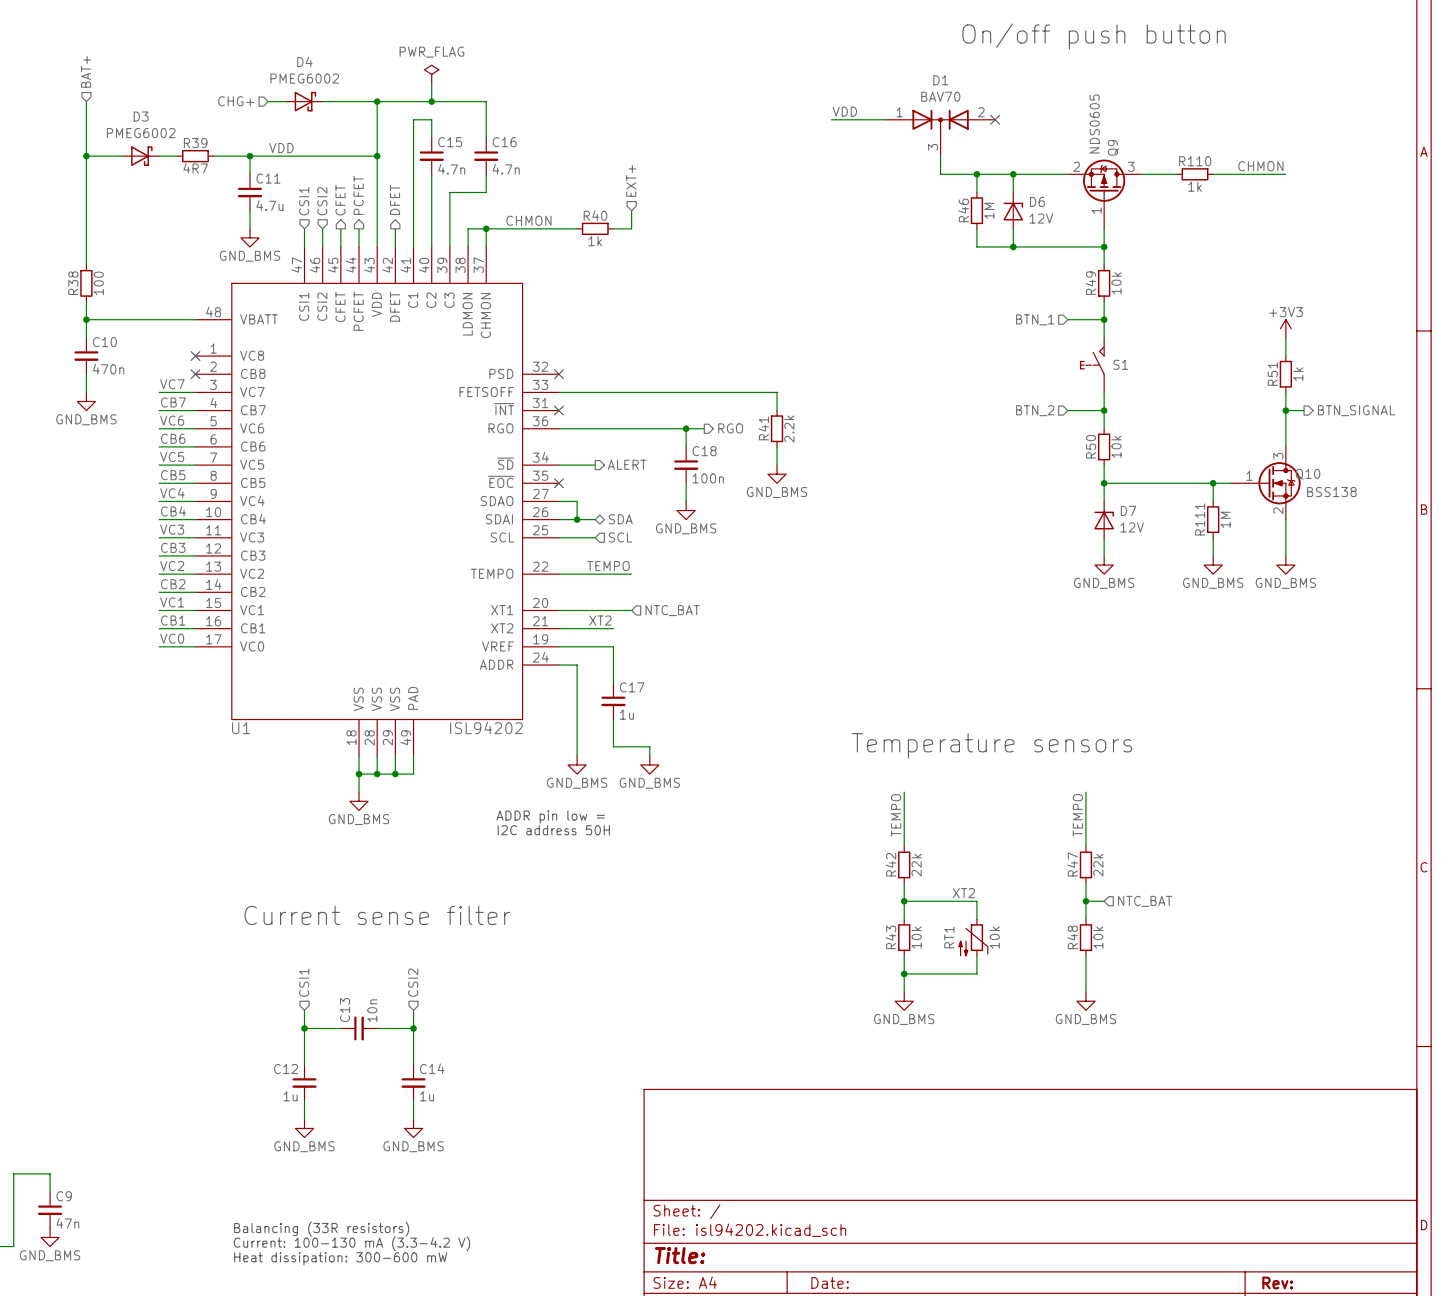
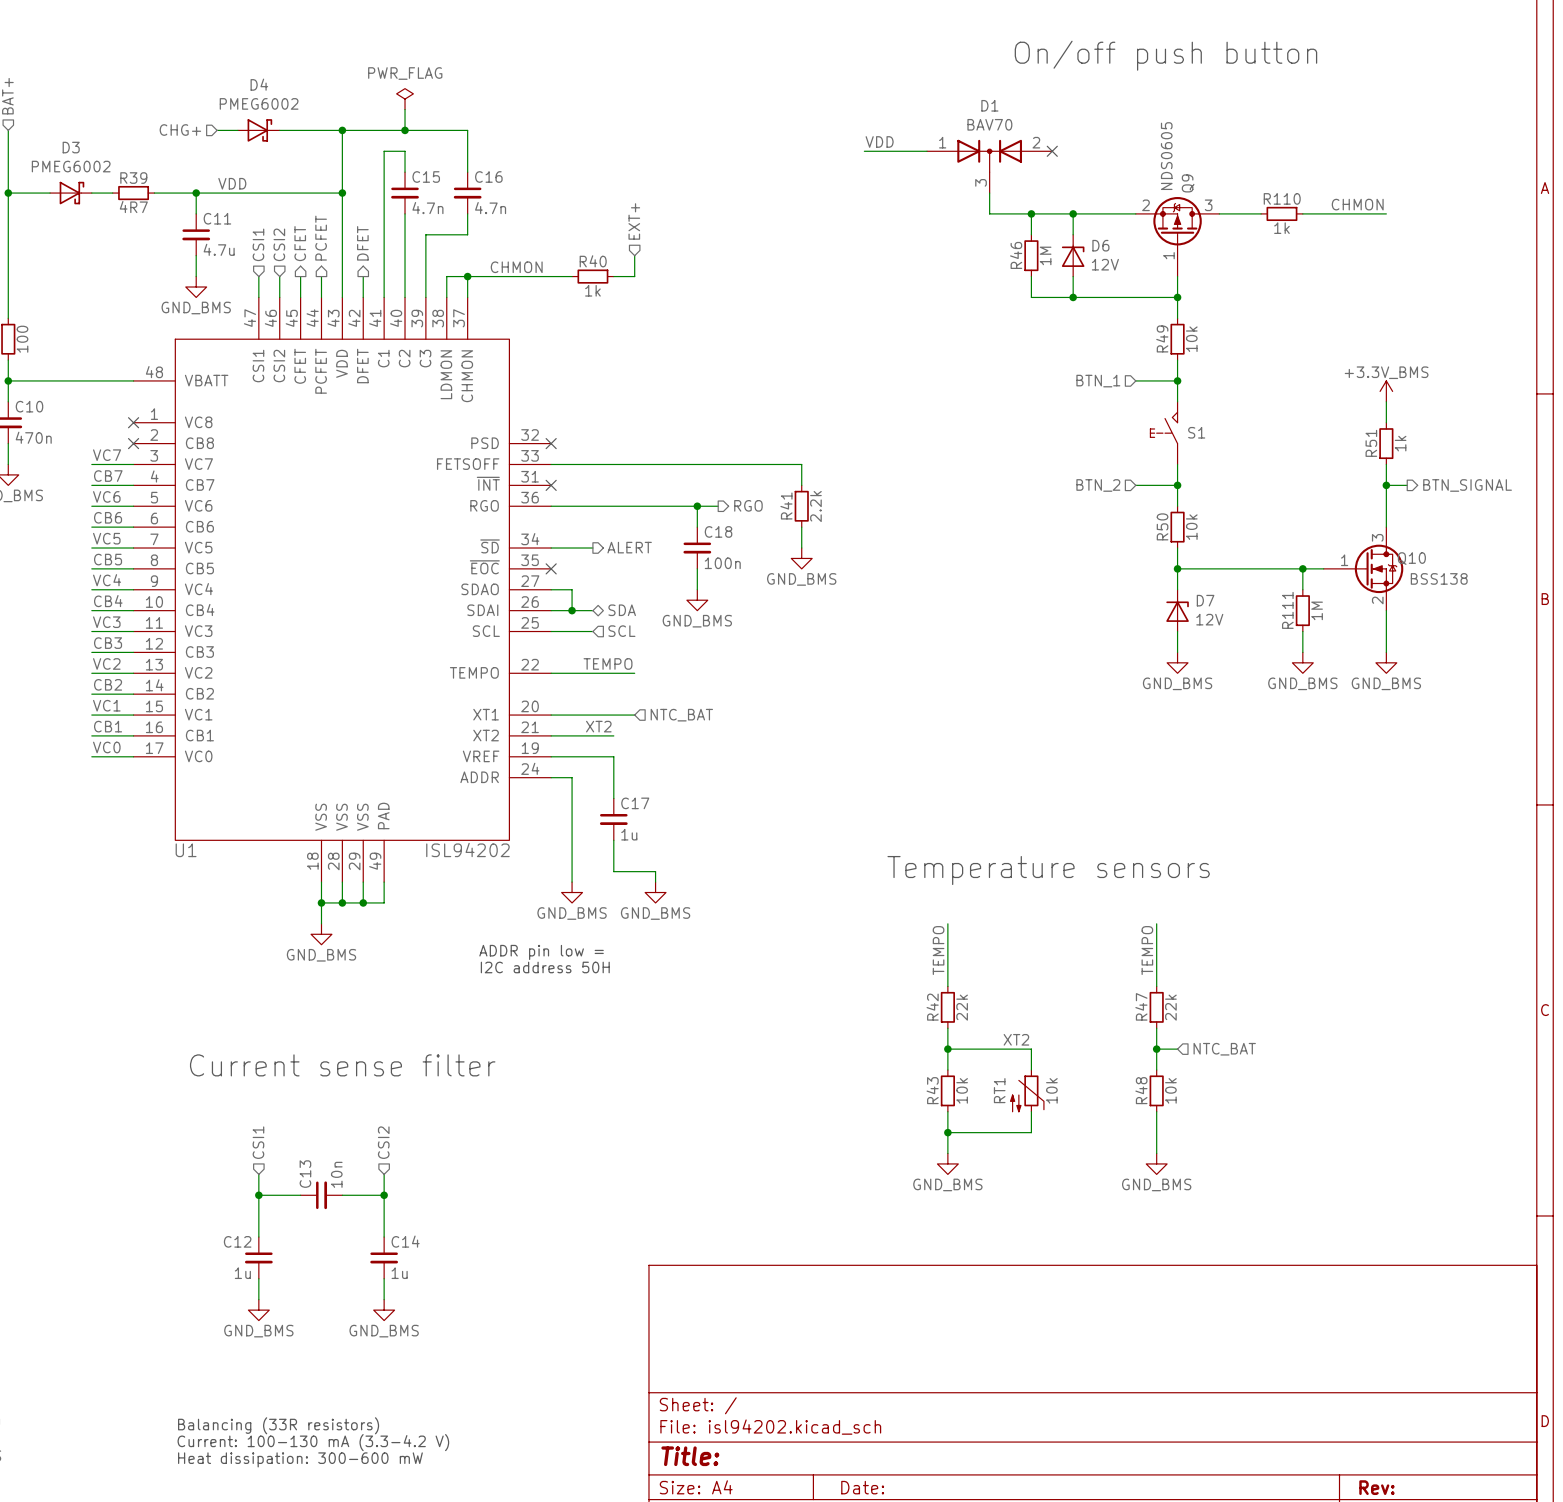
power symbol: +3V3 (1285, 328) -> +3.3V_BMS (1386, 391)

